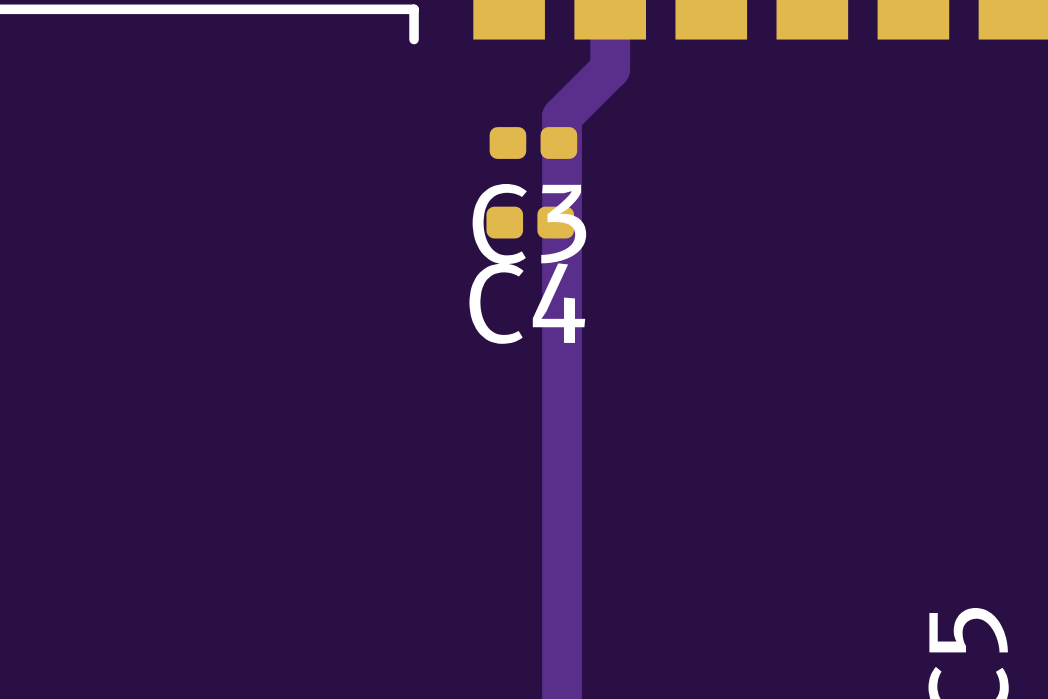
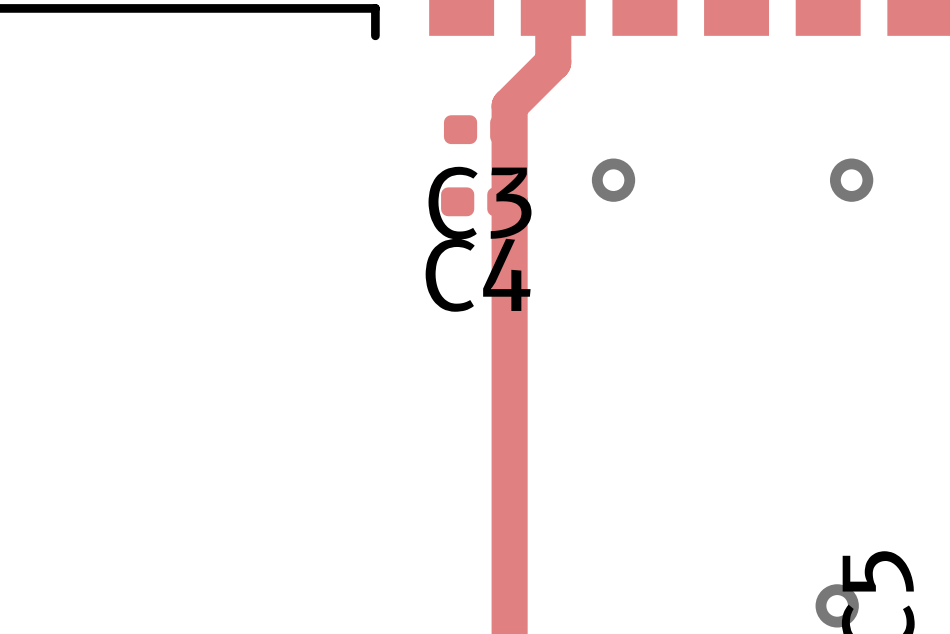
via: none -> (613, 180)
via: none -> (851, 180)
via: none -> (837, 605)

